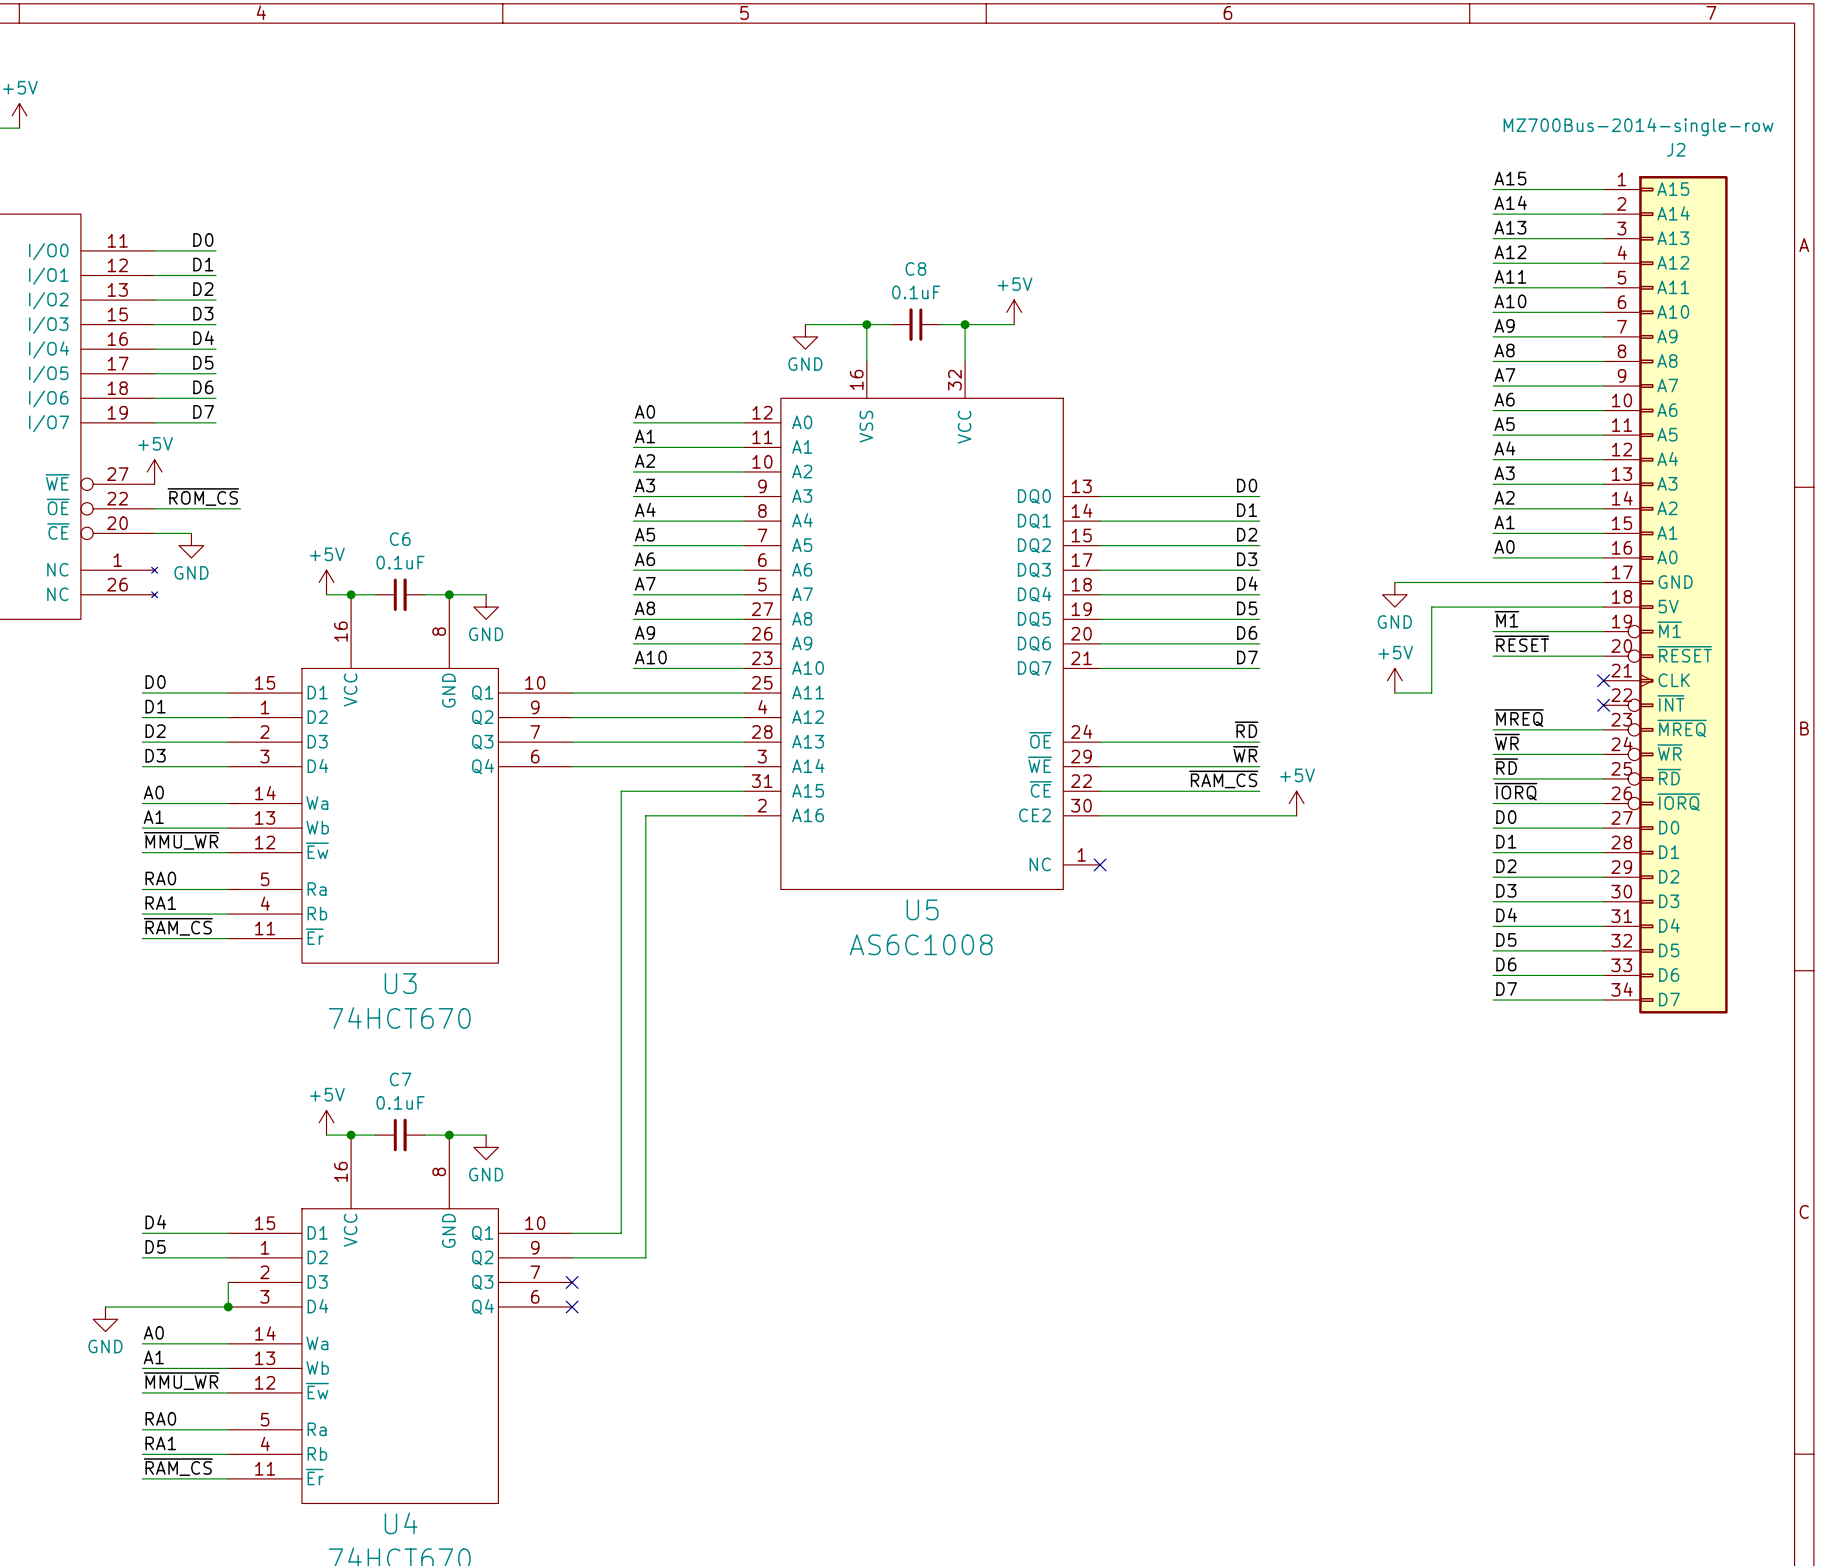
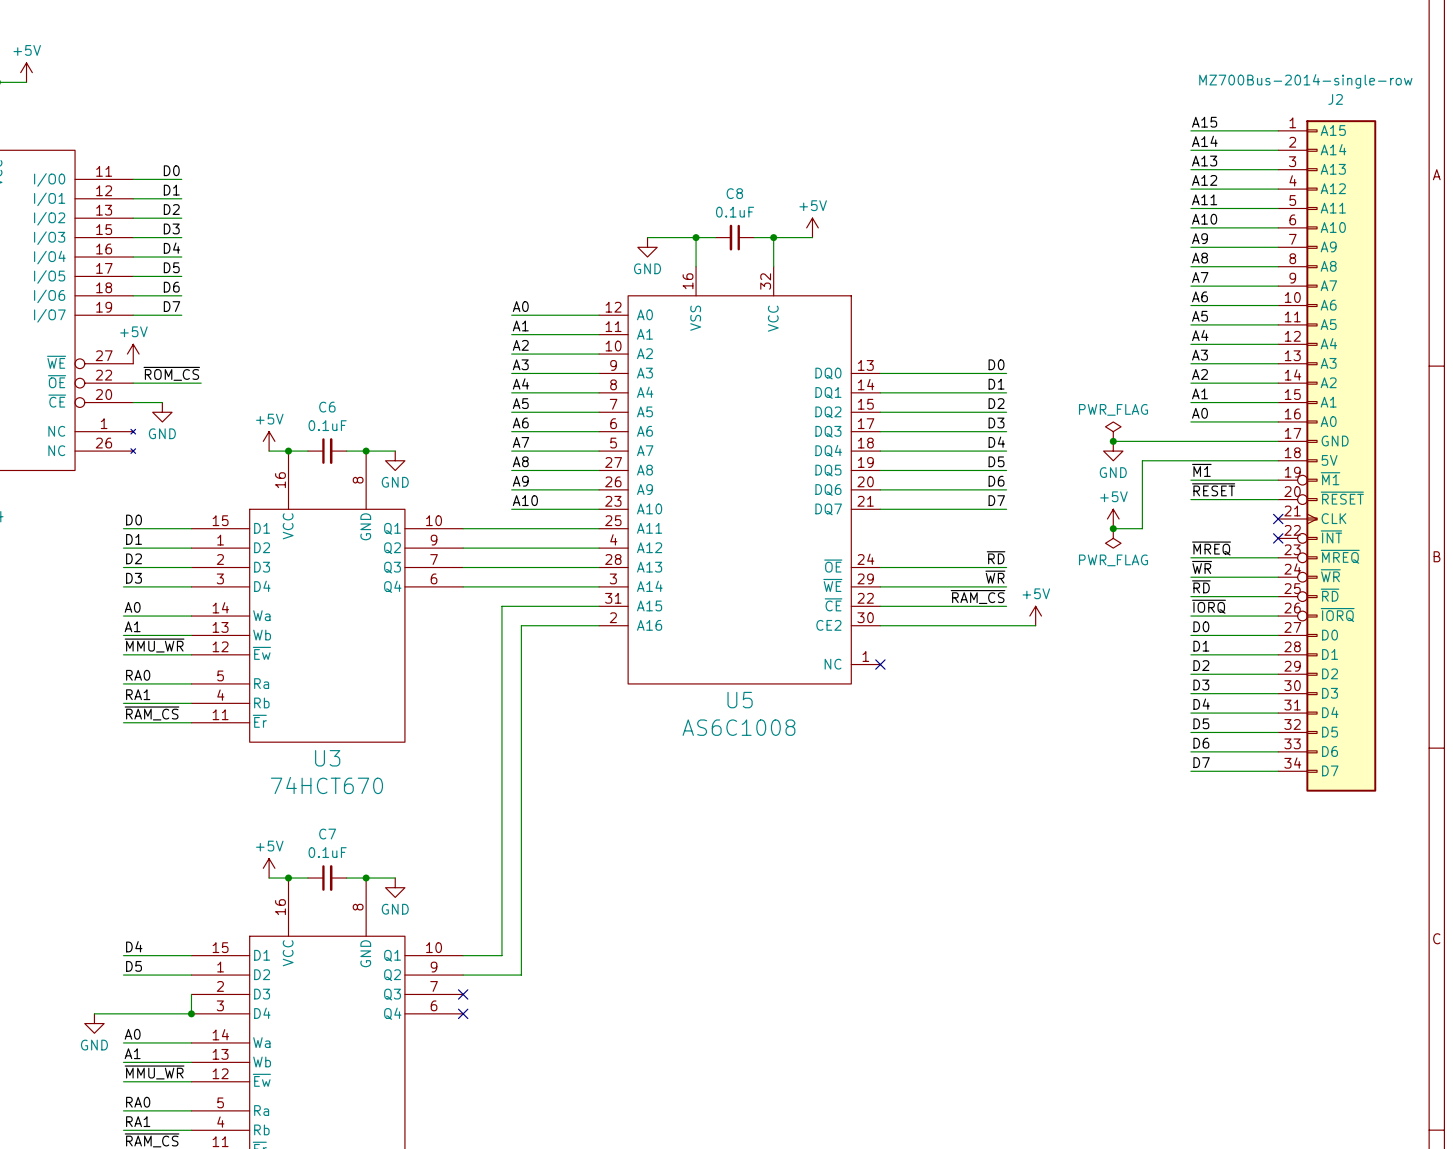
J2 symbol: [1603, 176, 1728, 1014] -> [1278, 120, 1377, 792]
power symbol: none -> PWR_FLAG (1113, 431)
junction: none -> (1113, 441)
junction: none -> (1113, 528)
power symbol: none -> PWR_FLAG (1113, 538)

